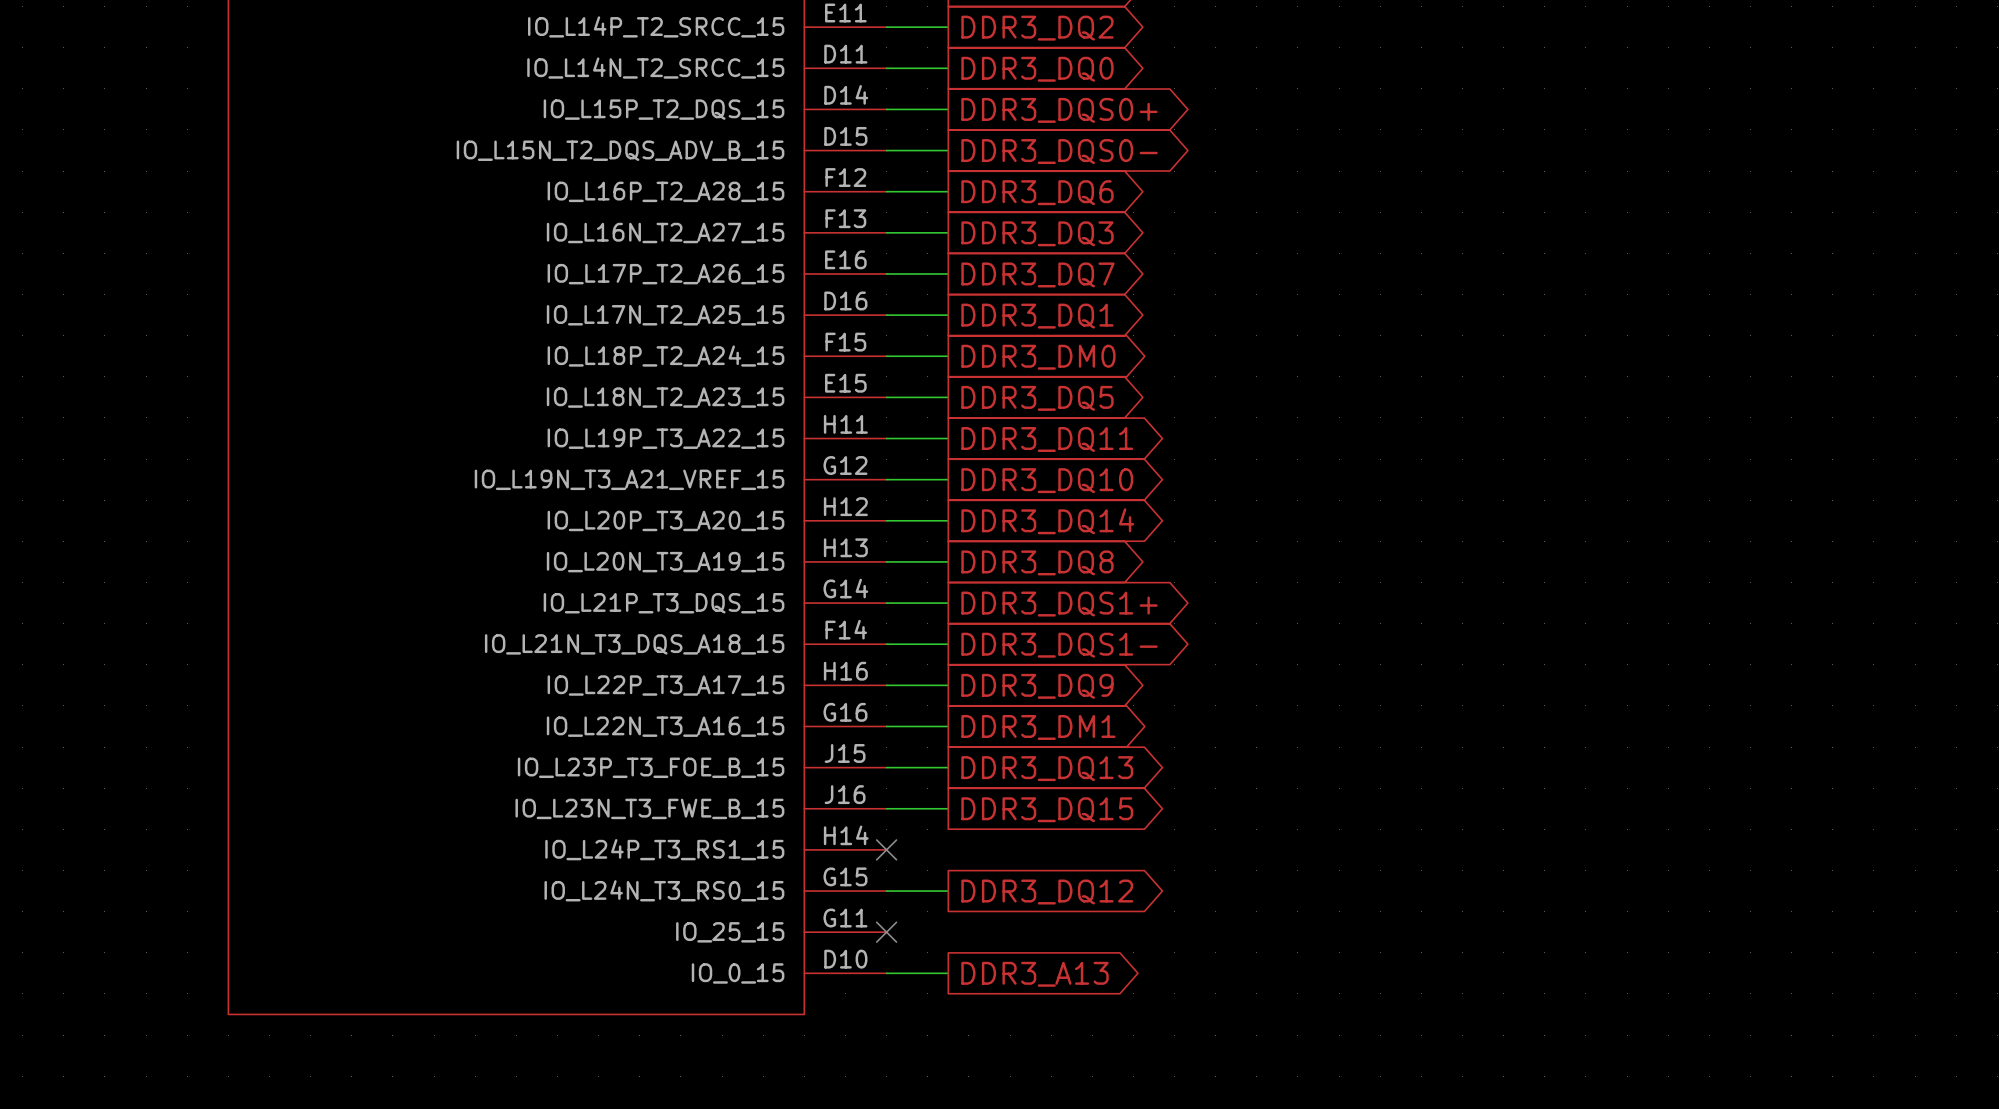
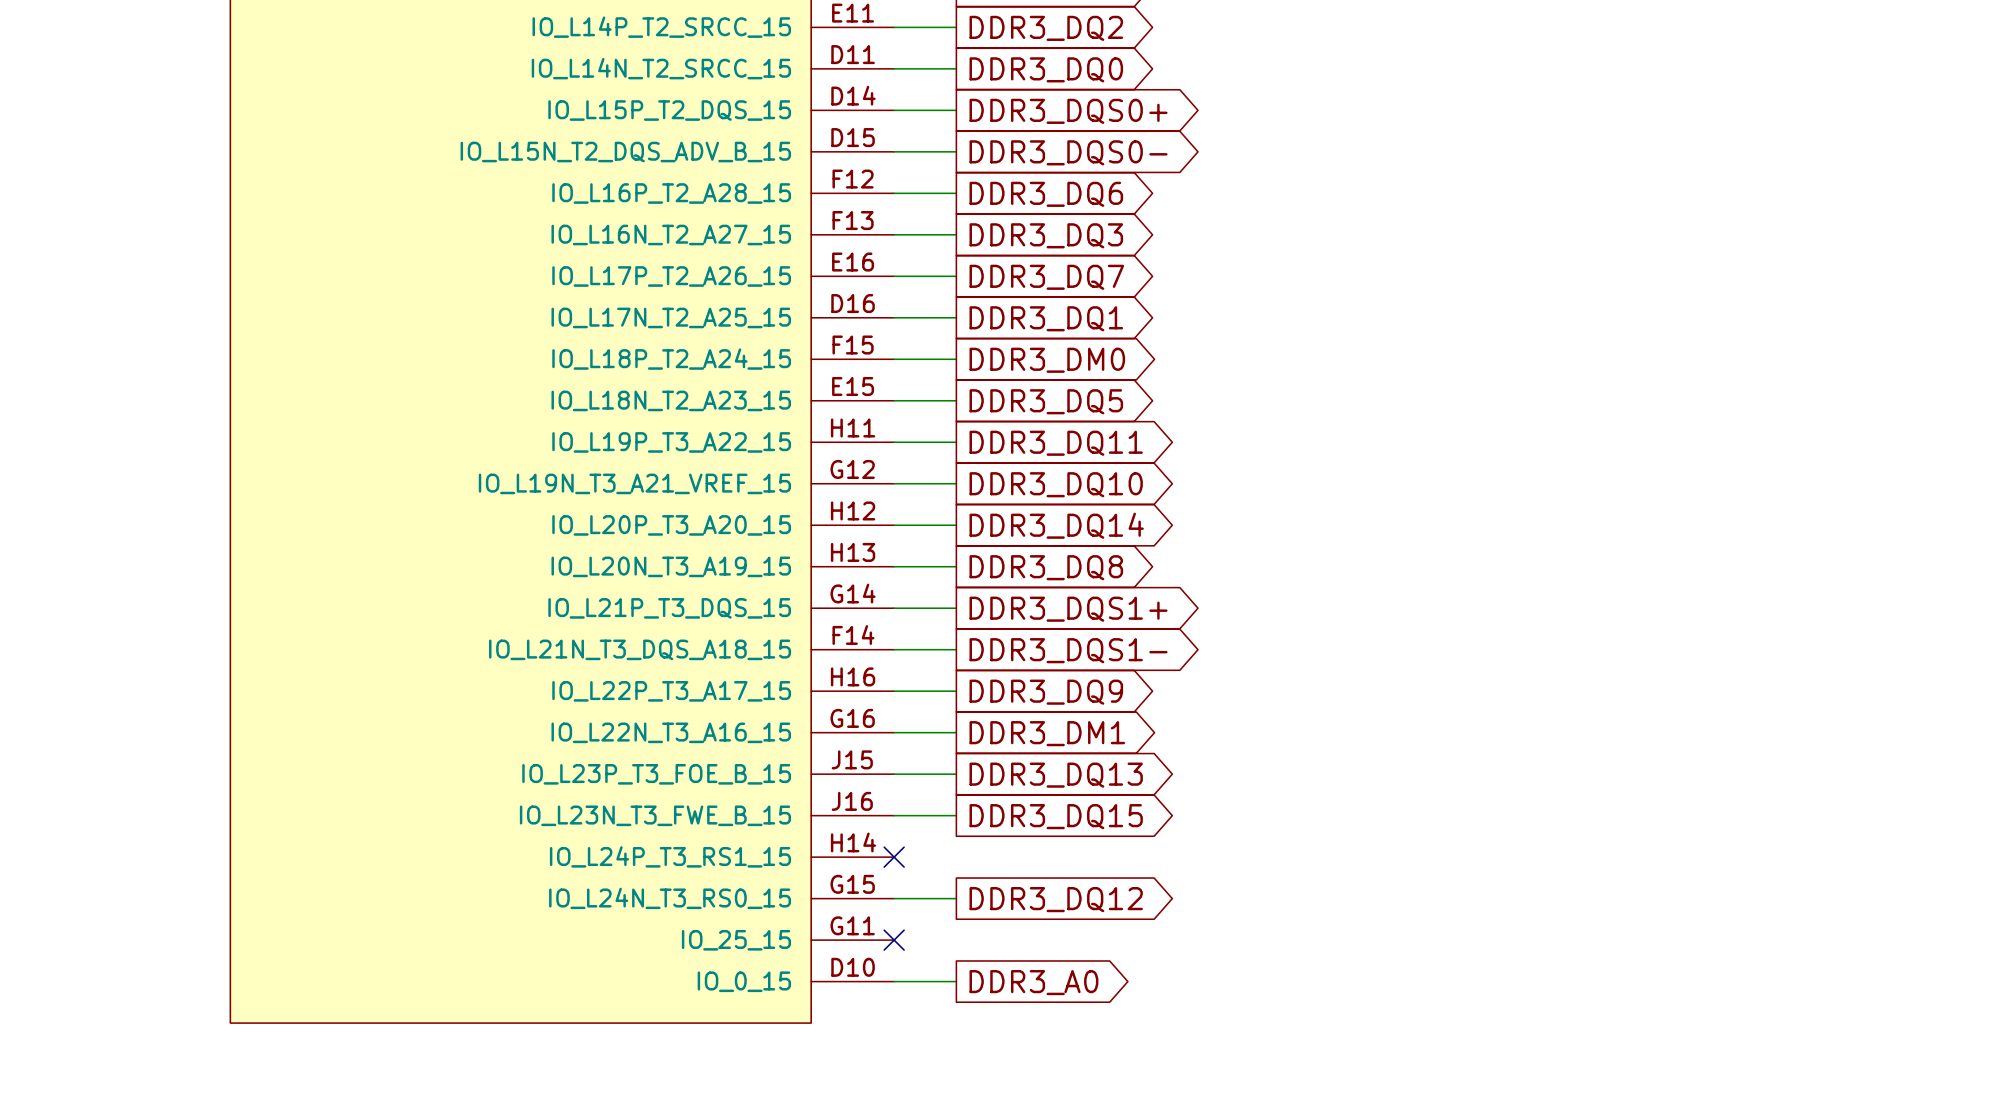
global label: DDR3_A13 (1035, 974) -> DDR3_A0 (1033, 982)

